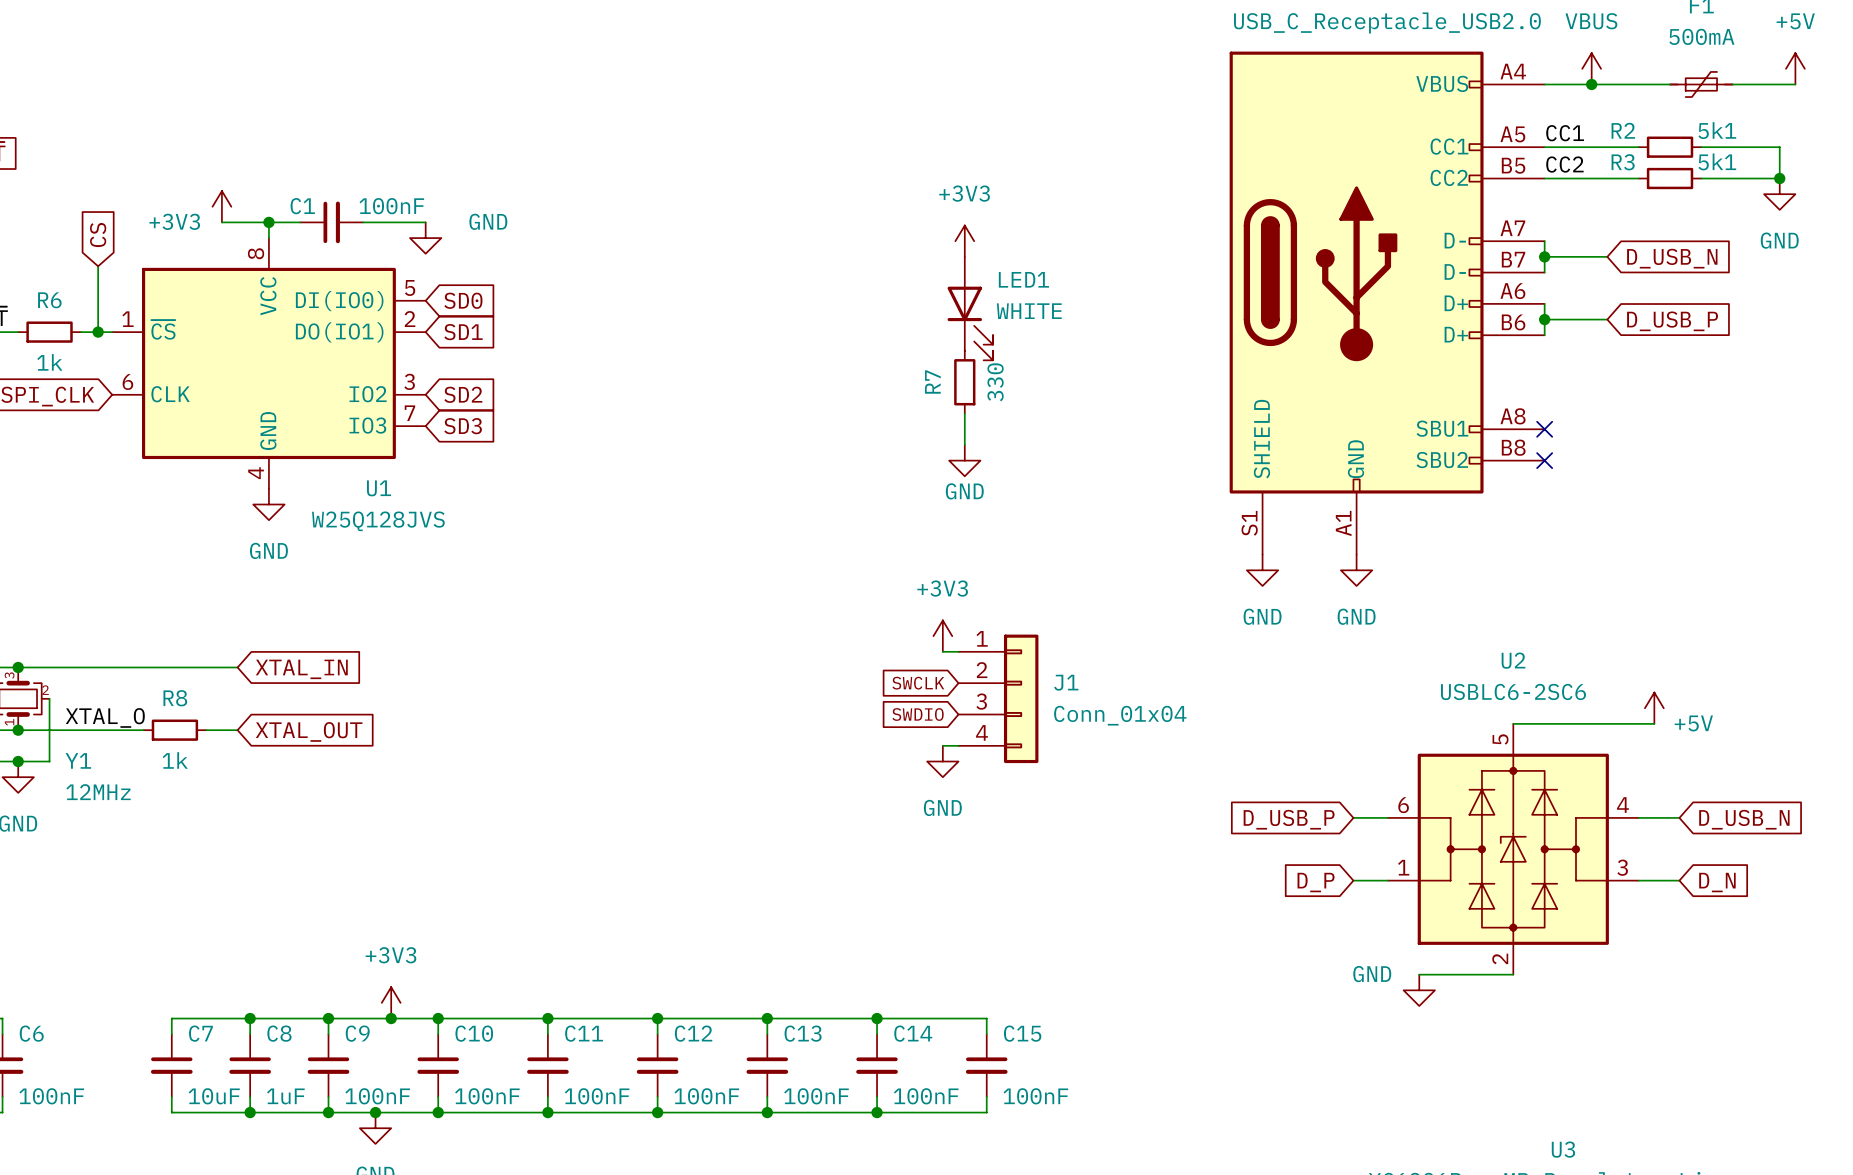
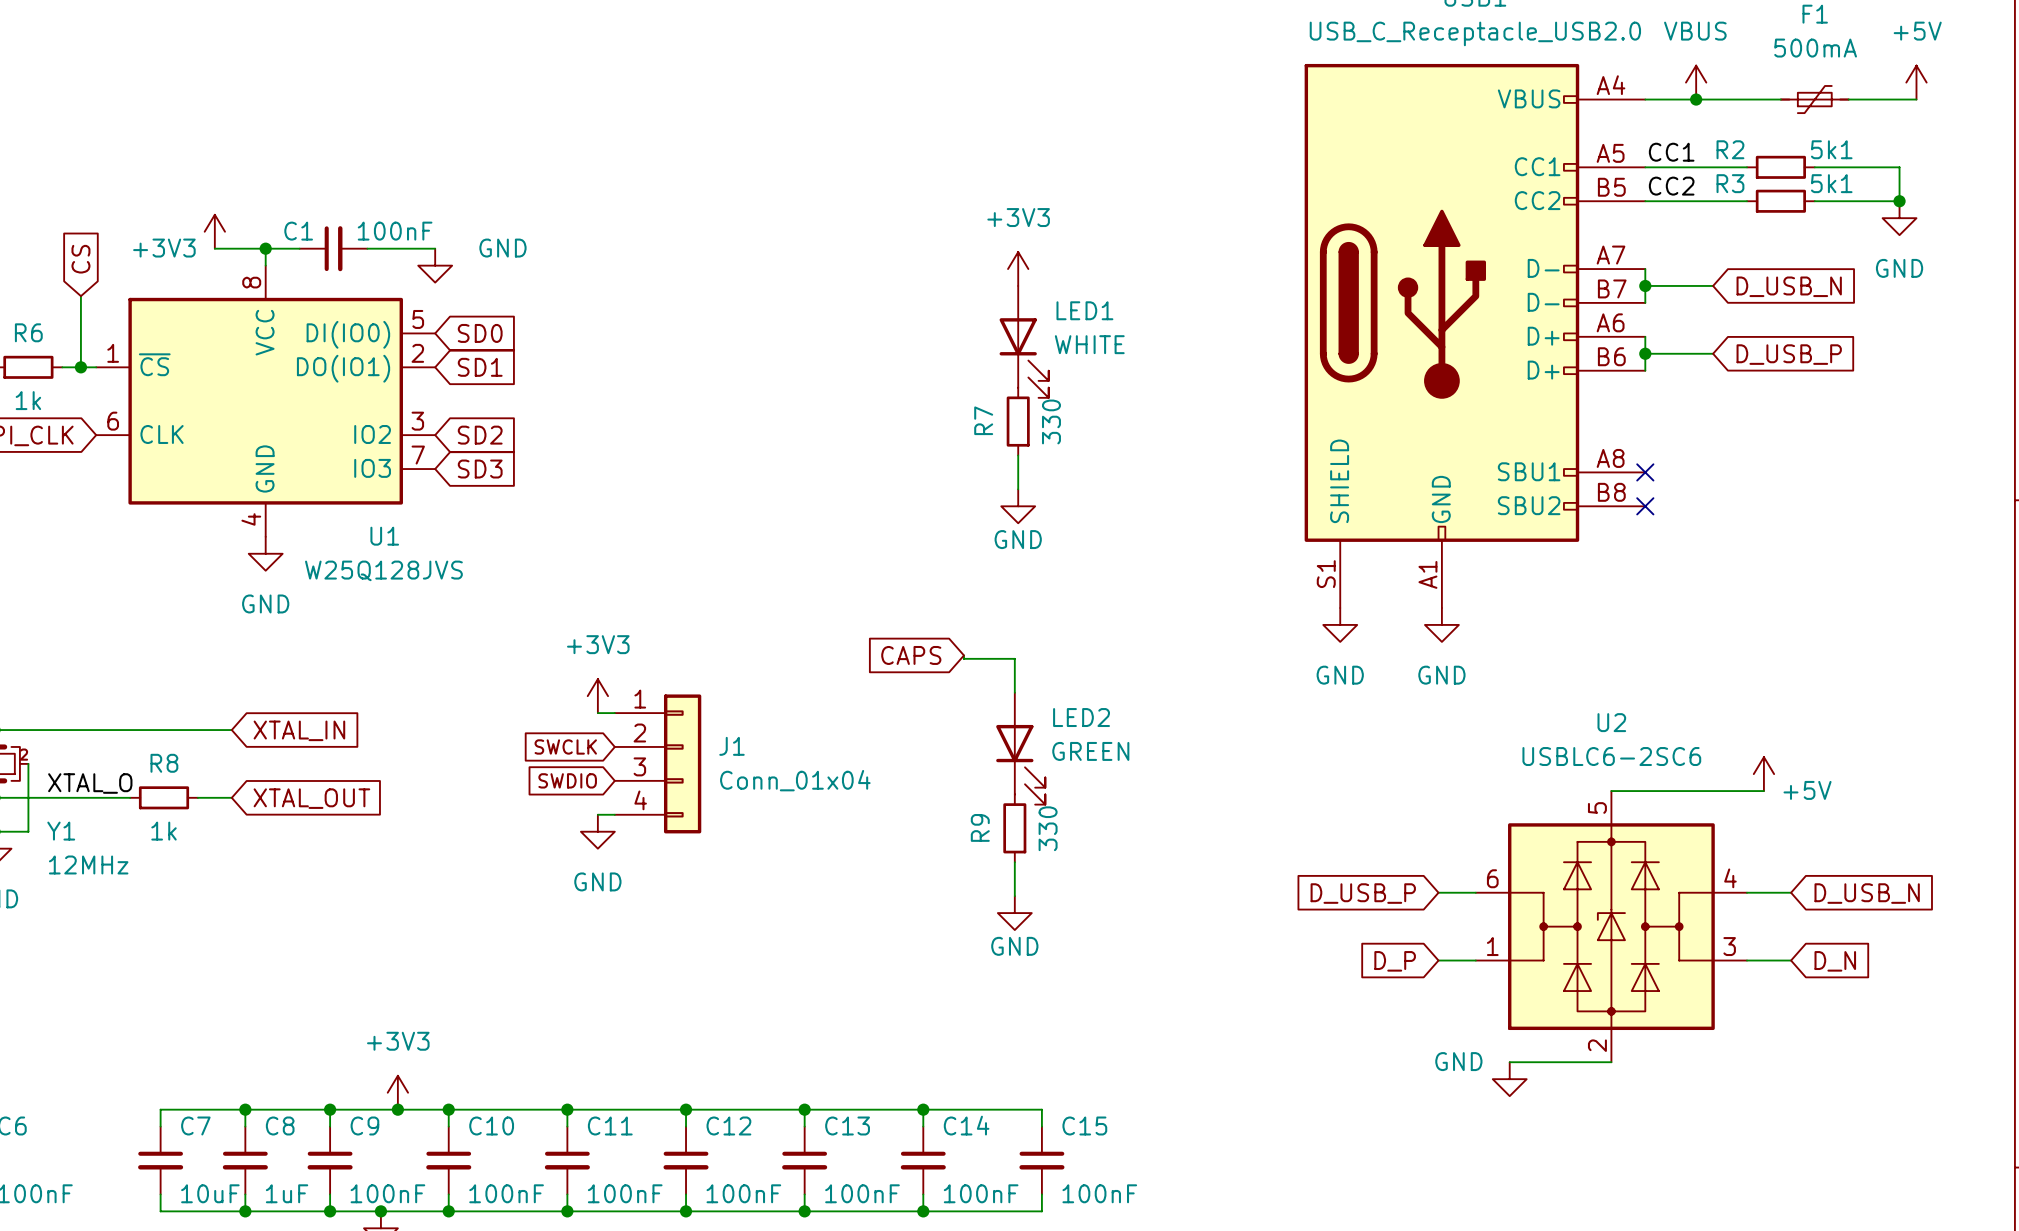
global label: none -> CAPS (911, 655)
wire: none -> (963, 655) (963, 658) (1014, 658) (1014, 692)
power symbol: none -> +3V3 (597, 696)
power symbol: +3V3 (942, 636) -> none
wire: none -> (597, 713) (614, 713)
wire: (942, 651) (958, 651) -> none
global label: none -> SWCLK (565, 746)
global label: SWCLK (918, 683) -> none
LED2: none -> GREEN (1020, 748)
J1 position: (998, 698) -> (658, 763)
global label: none -> SWDIO (567, 780)
global label: SWDIO (918, 714) -> none
wire: none -> (597, 814) (614, 814)
wire: (942, 745) (958, 745) -> none
R9: none -> 330 (1014, 828)
power symbol: none -> GND (597, 831)
power symbol position: GND (942, 761) -> GND (1014, 913)
wire: none -> (1014, 862) (1014, 896)
power symbol text position: GND (942, 807) -> GND (1014, 946)

